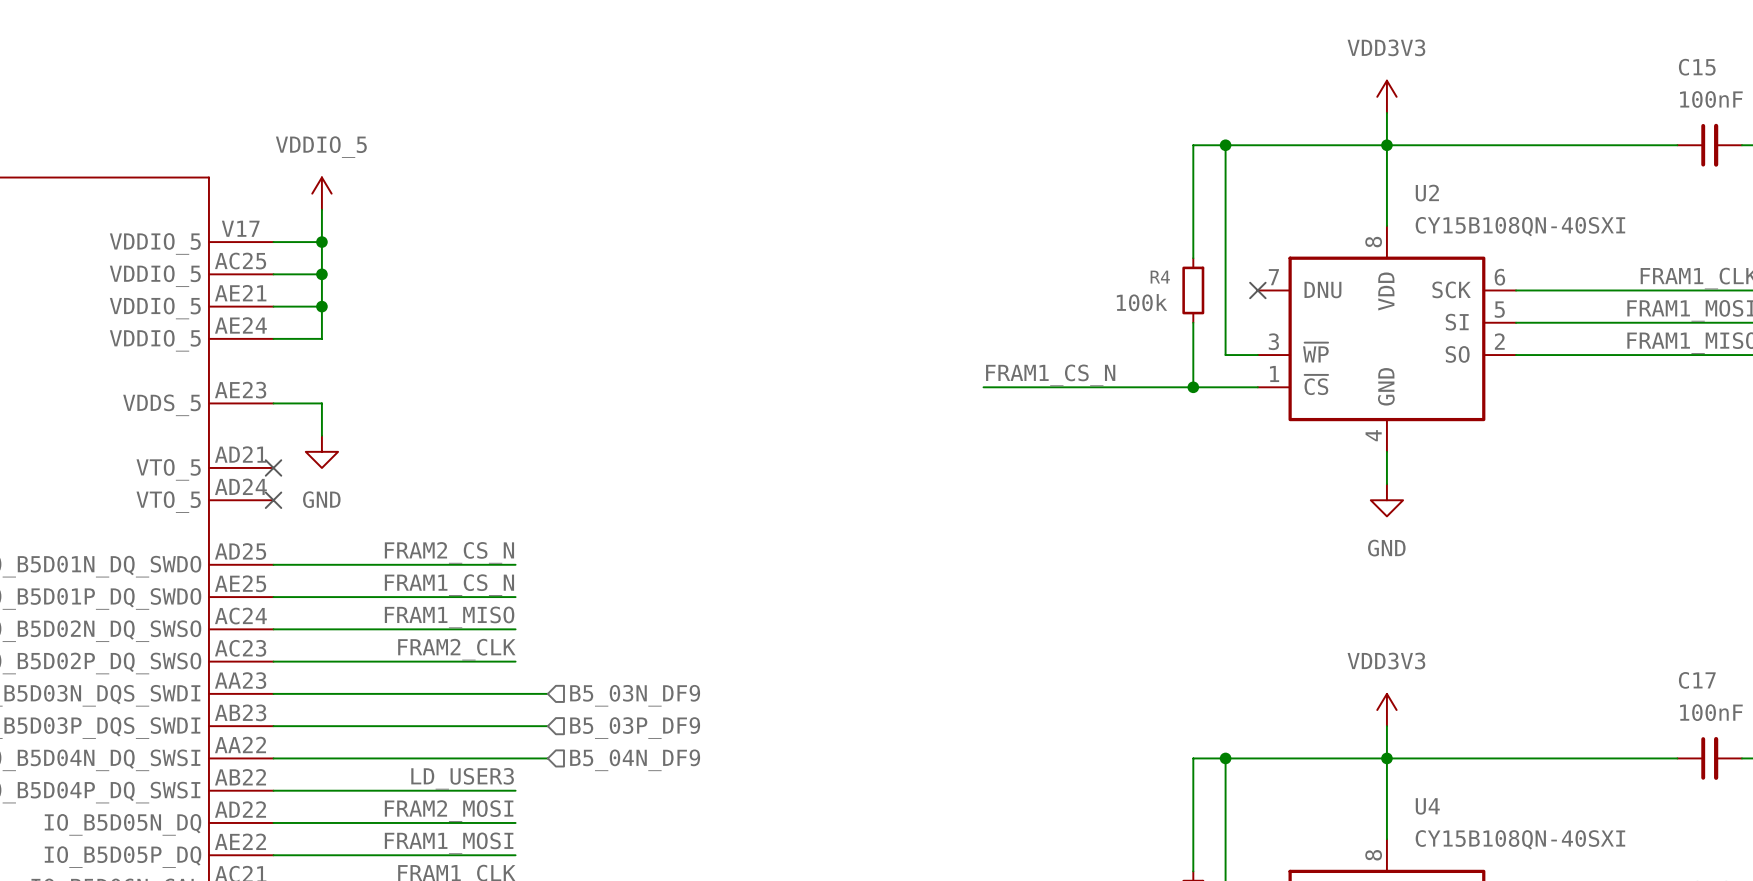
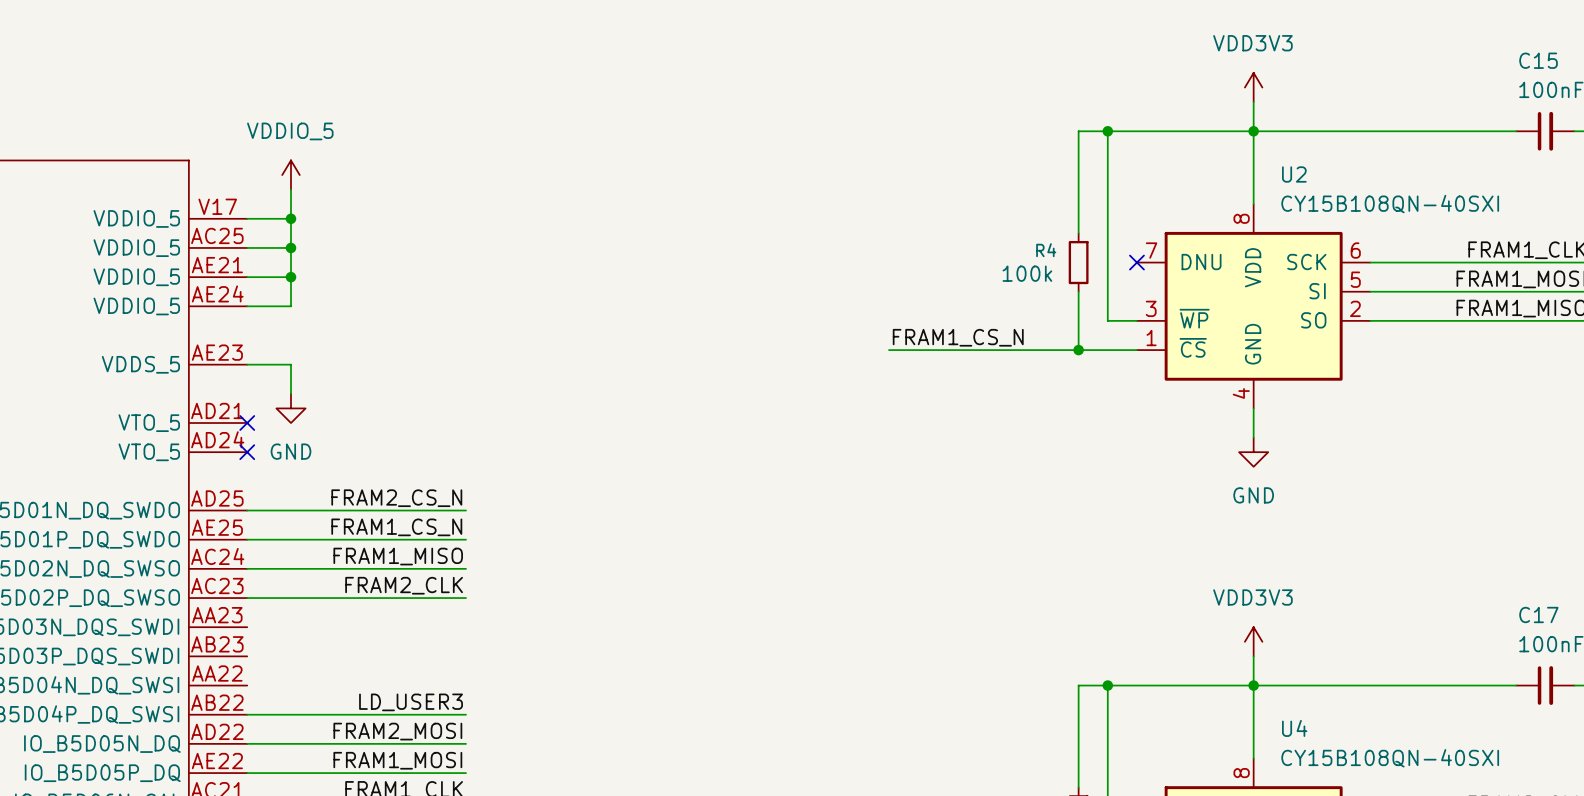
wire: (273, 693) (547, 693) -> none
hierarchical label: B5_03N_DF9 (635, 695) -> none
wire: (273, 726) (547, 726) -> none
hierarchical label: B5_03P_DF9 (635, 728) -> none
wire: (273, 758) (547, 758) -> none
hierarchical label: B5_04N_DF9 (635, 760) -> none

